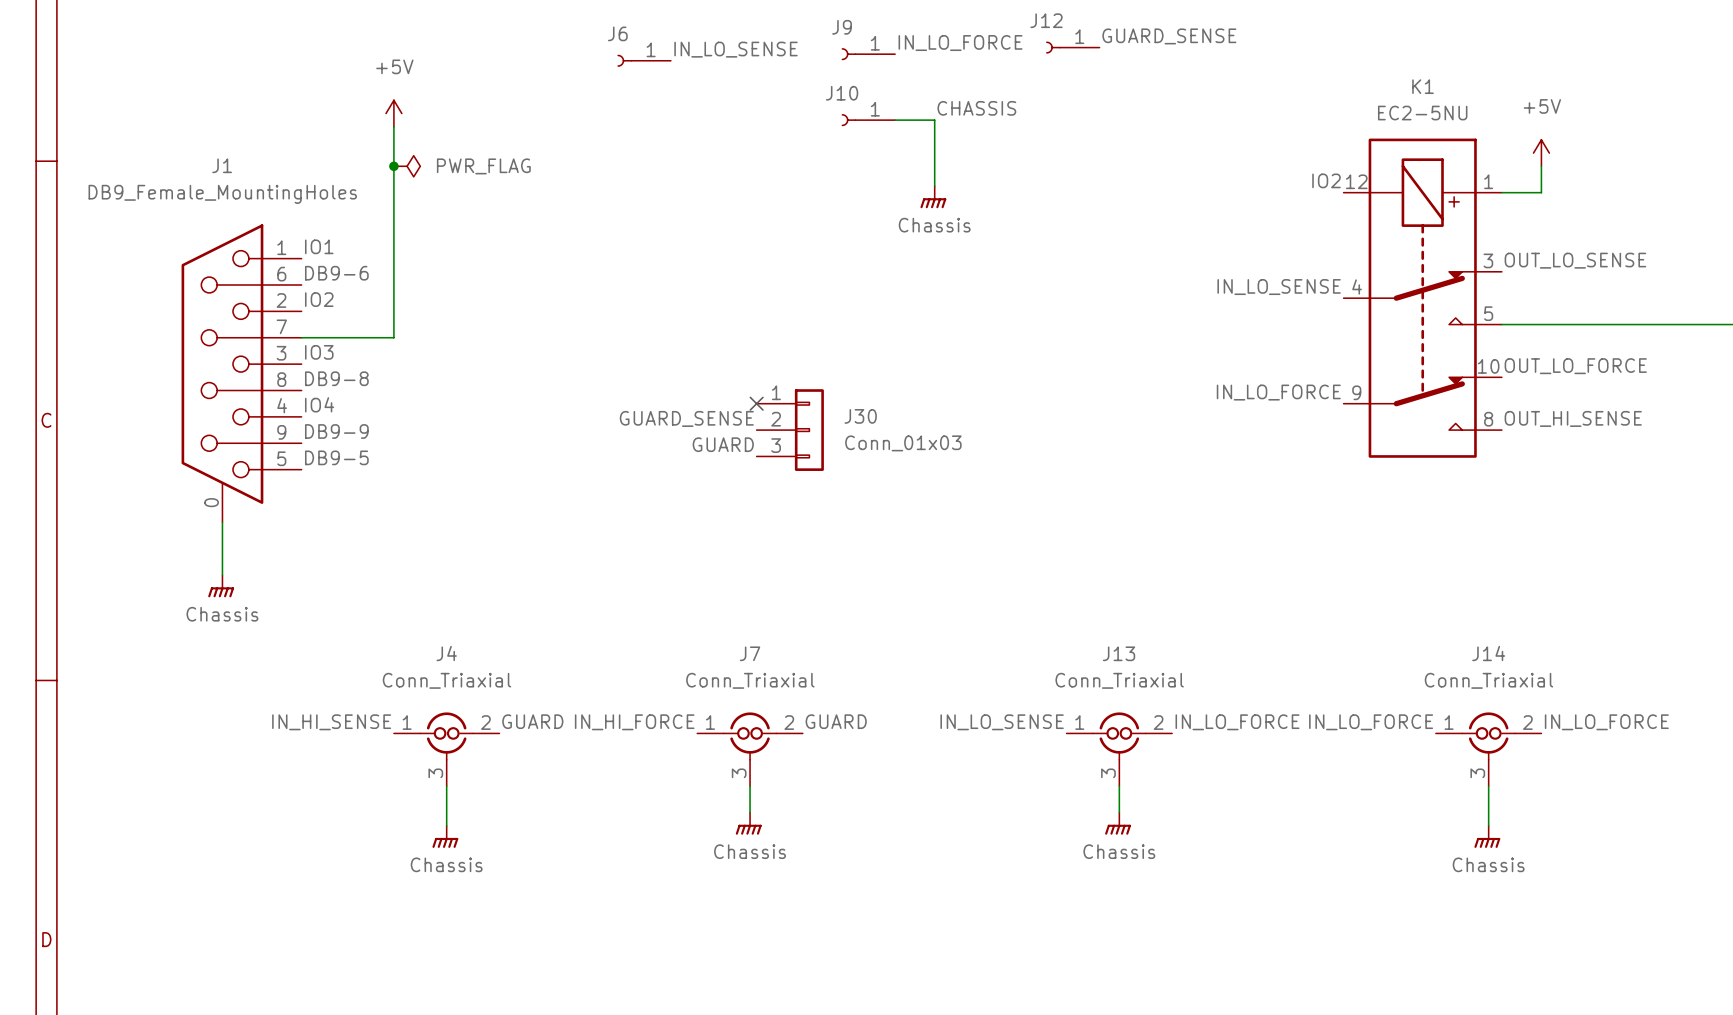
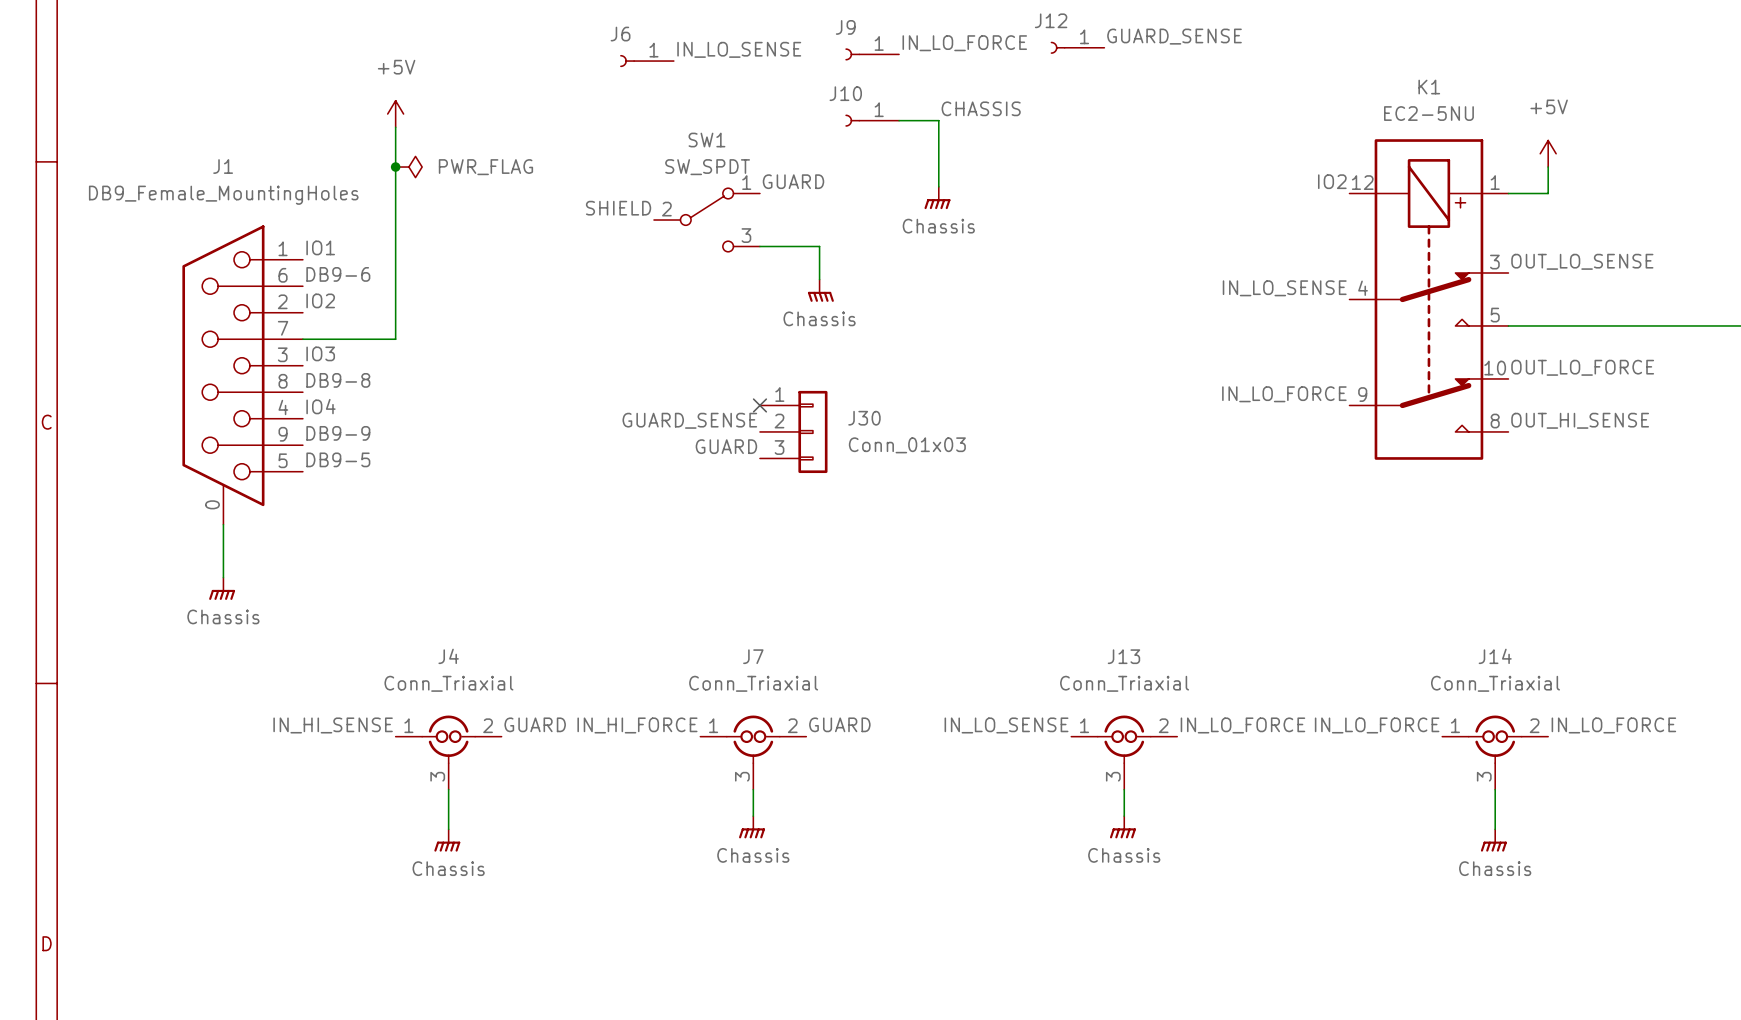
label: none -> GUARD (793, 181)
label: none -> SHIELD (618, 208)
SW1: none -> SW_SPDT (706, 220)
wire: none -> (759, 246) (819, 246) (819, 279)
power symbol: none -> (820, 290)

